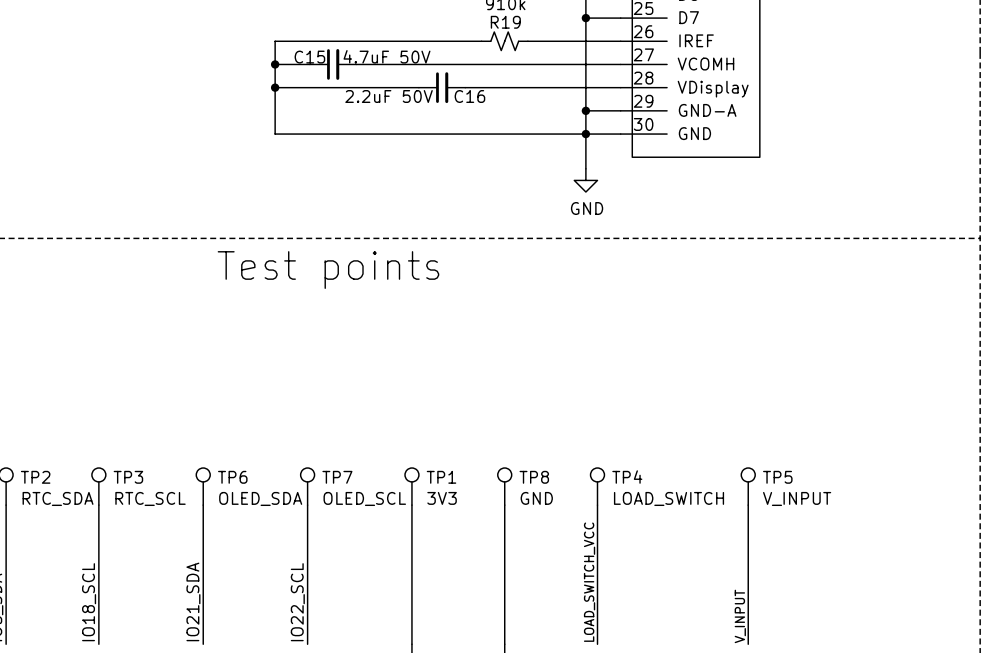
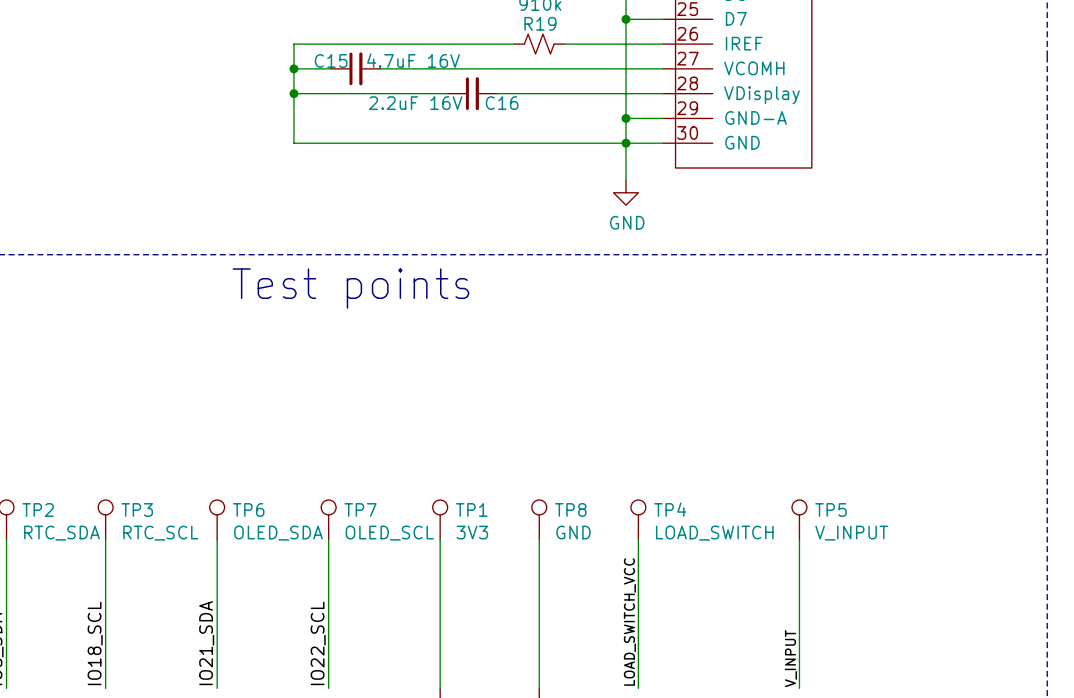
C15 value: 4.7uF 50V (387, 56) -> 4.7uF 16V (413, 60)
C16 value: 2.2uF 50V (389, 96) -> 2.2uF 16V (415, 103)

